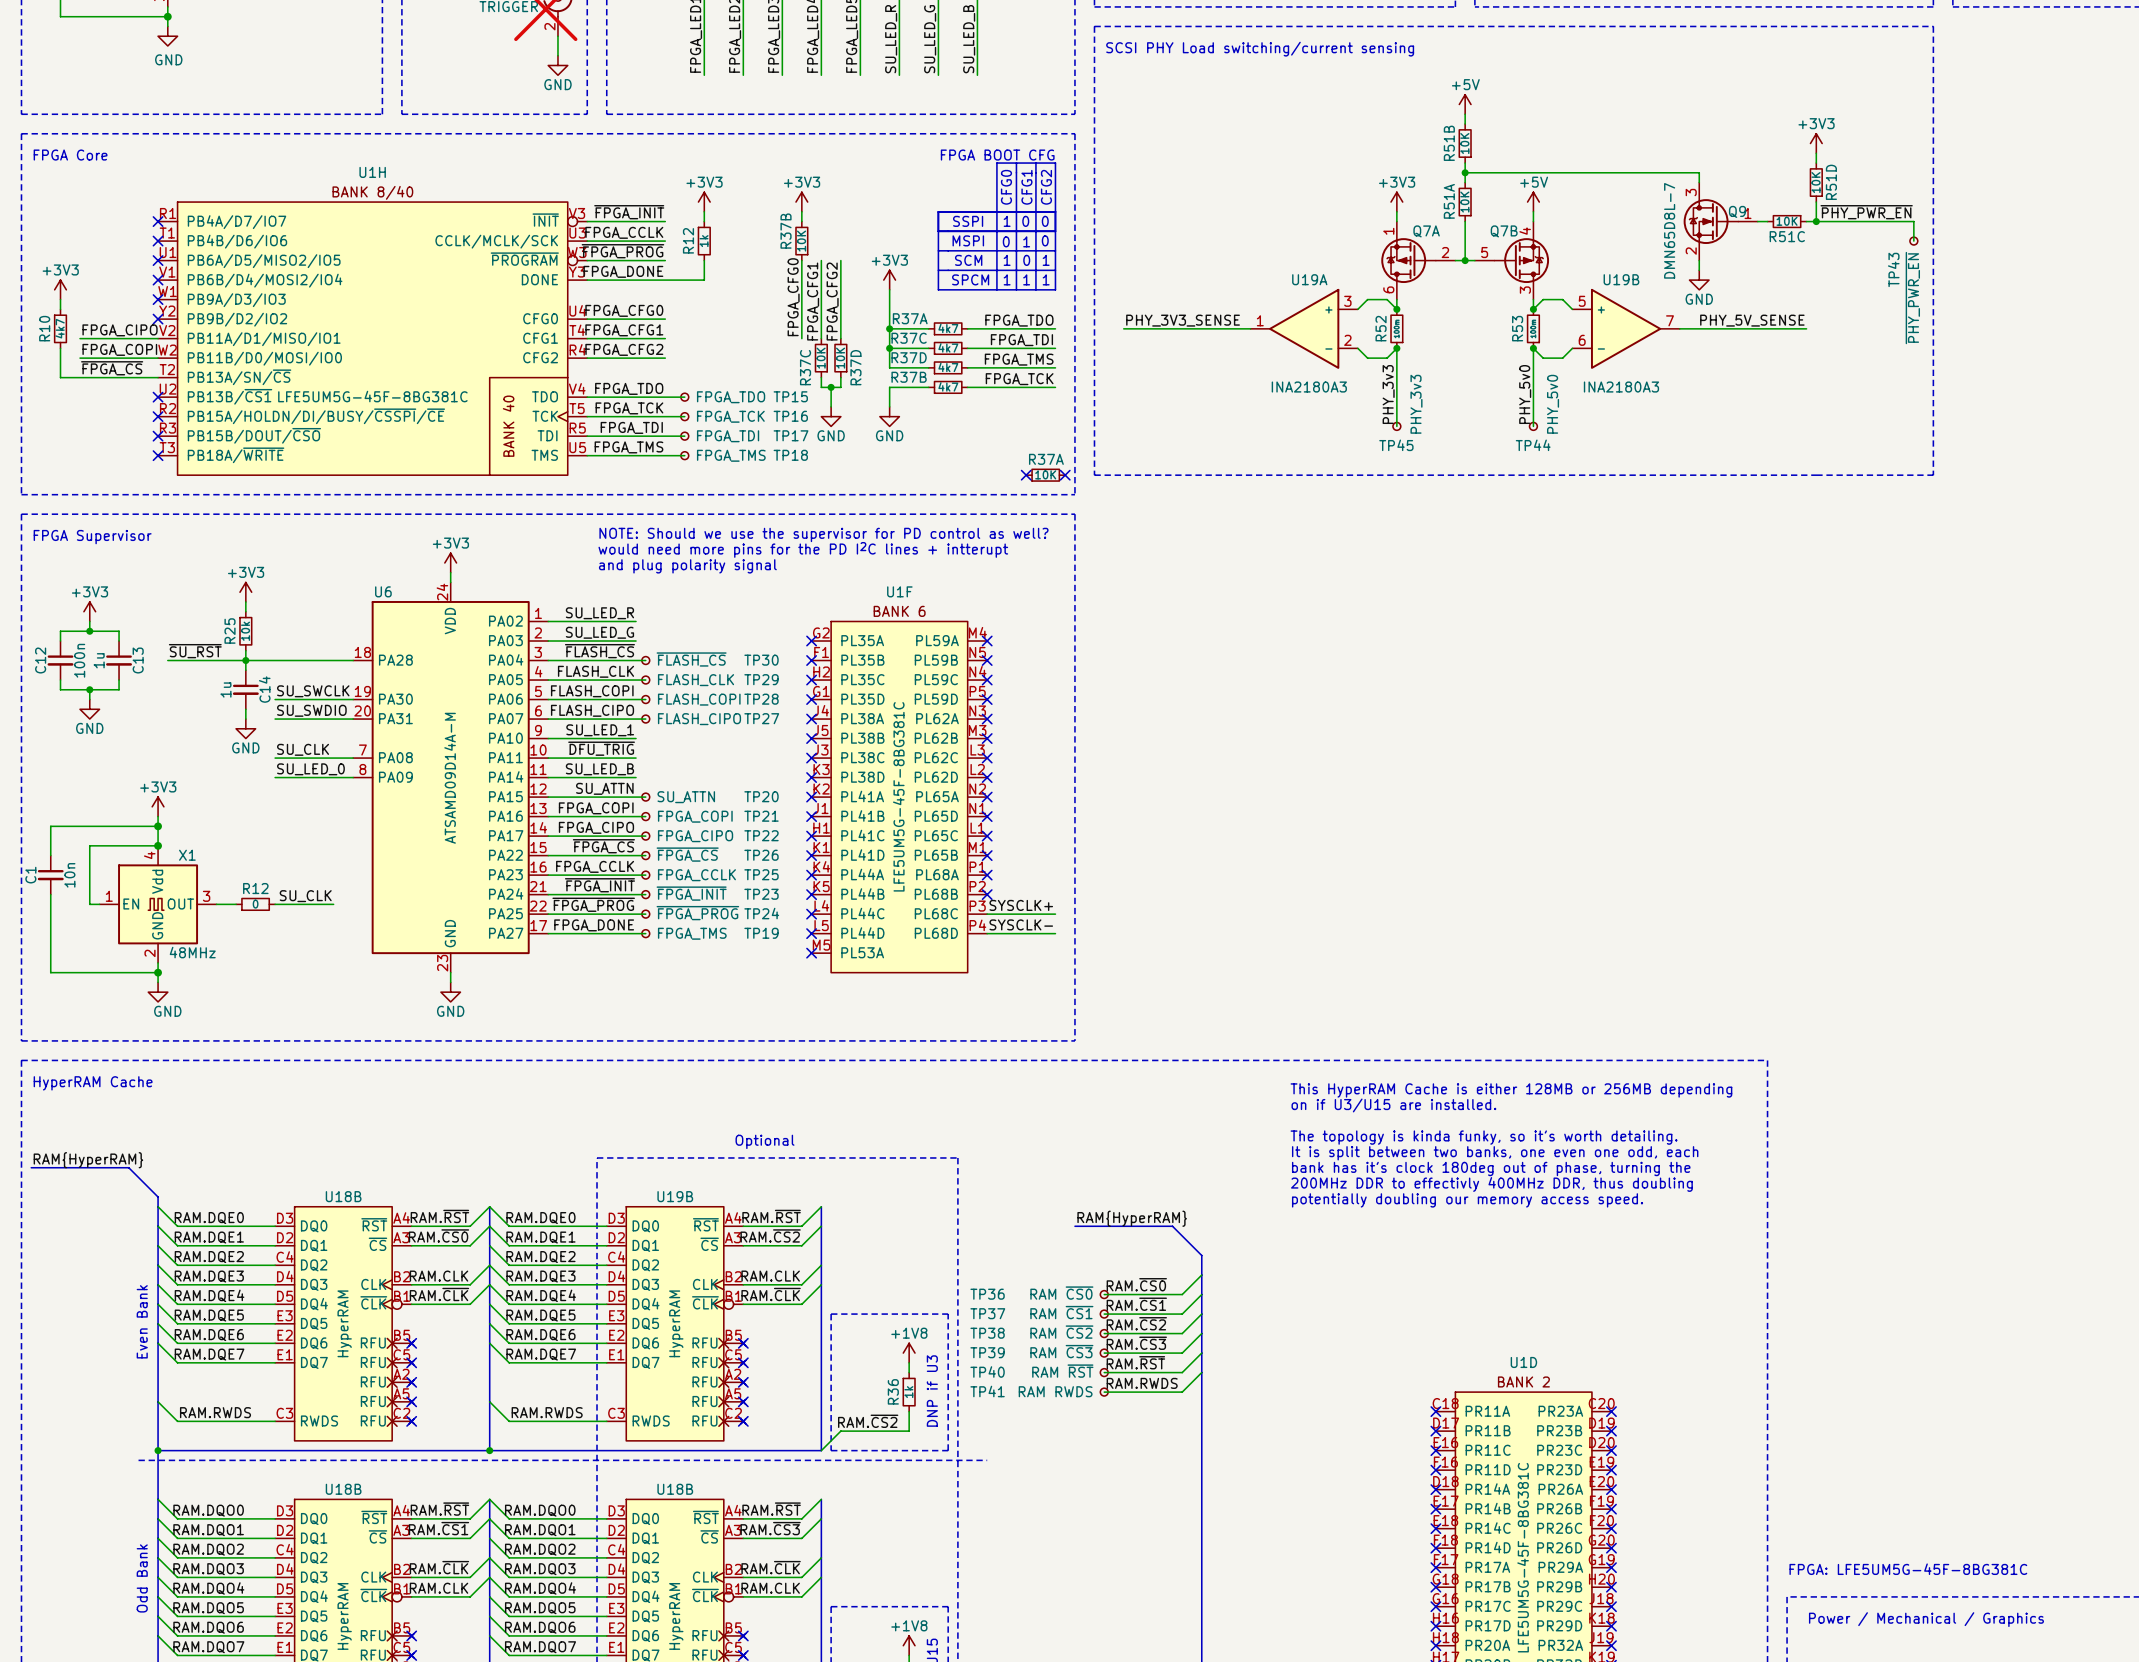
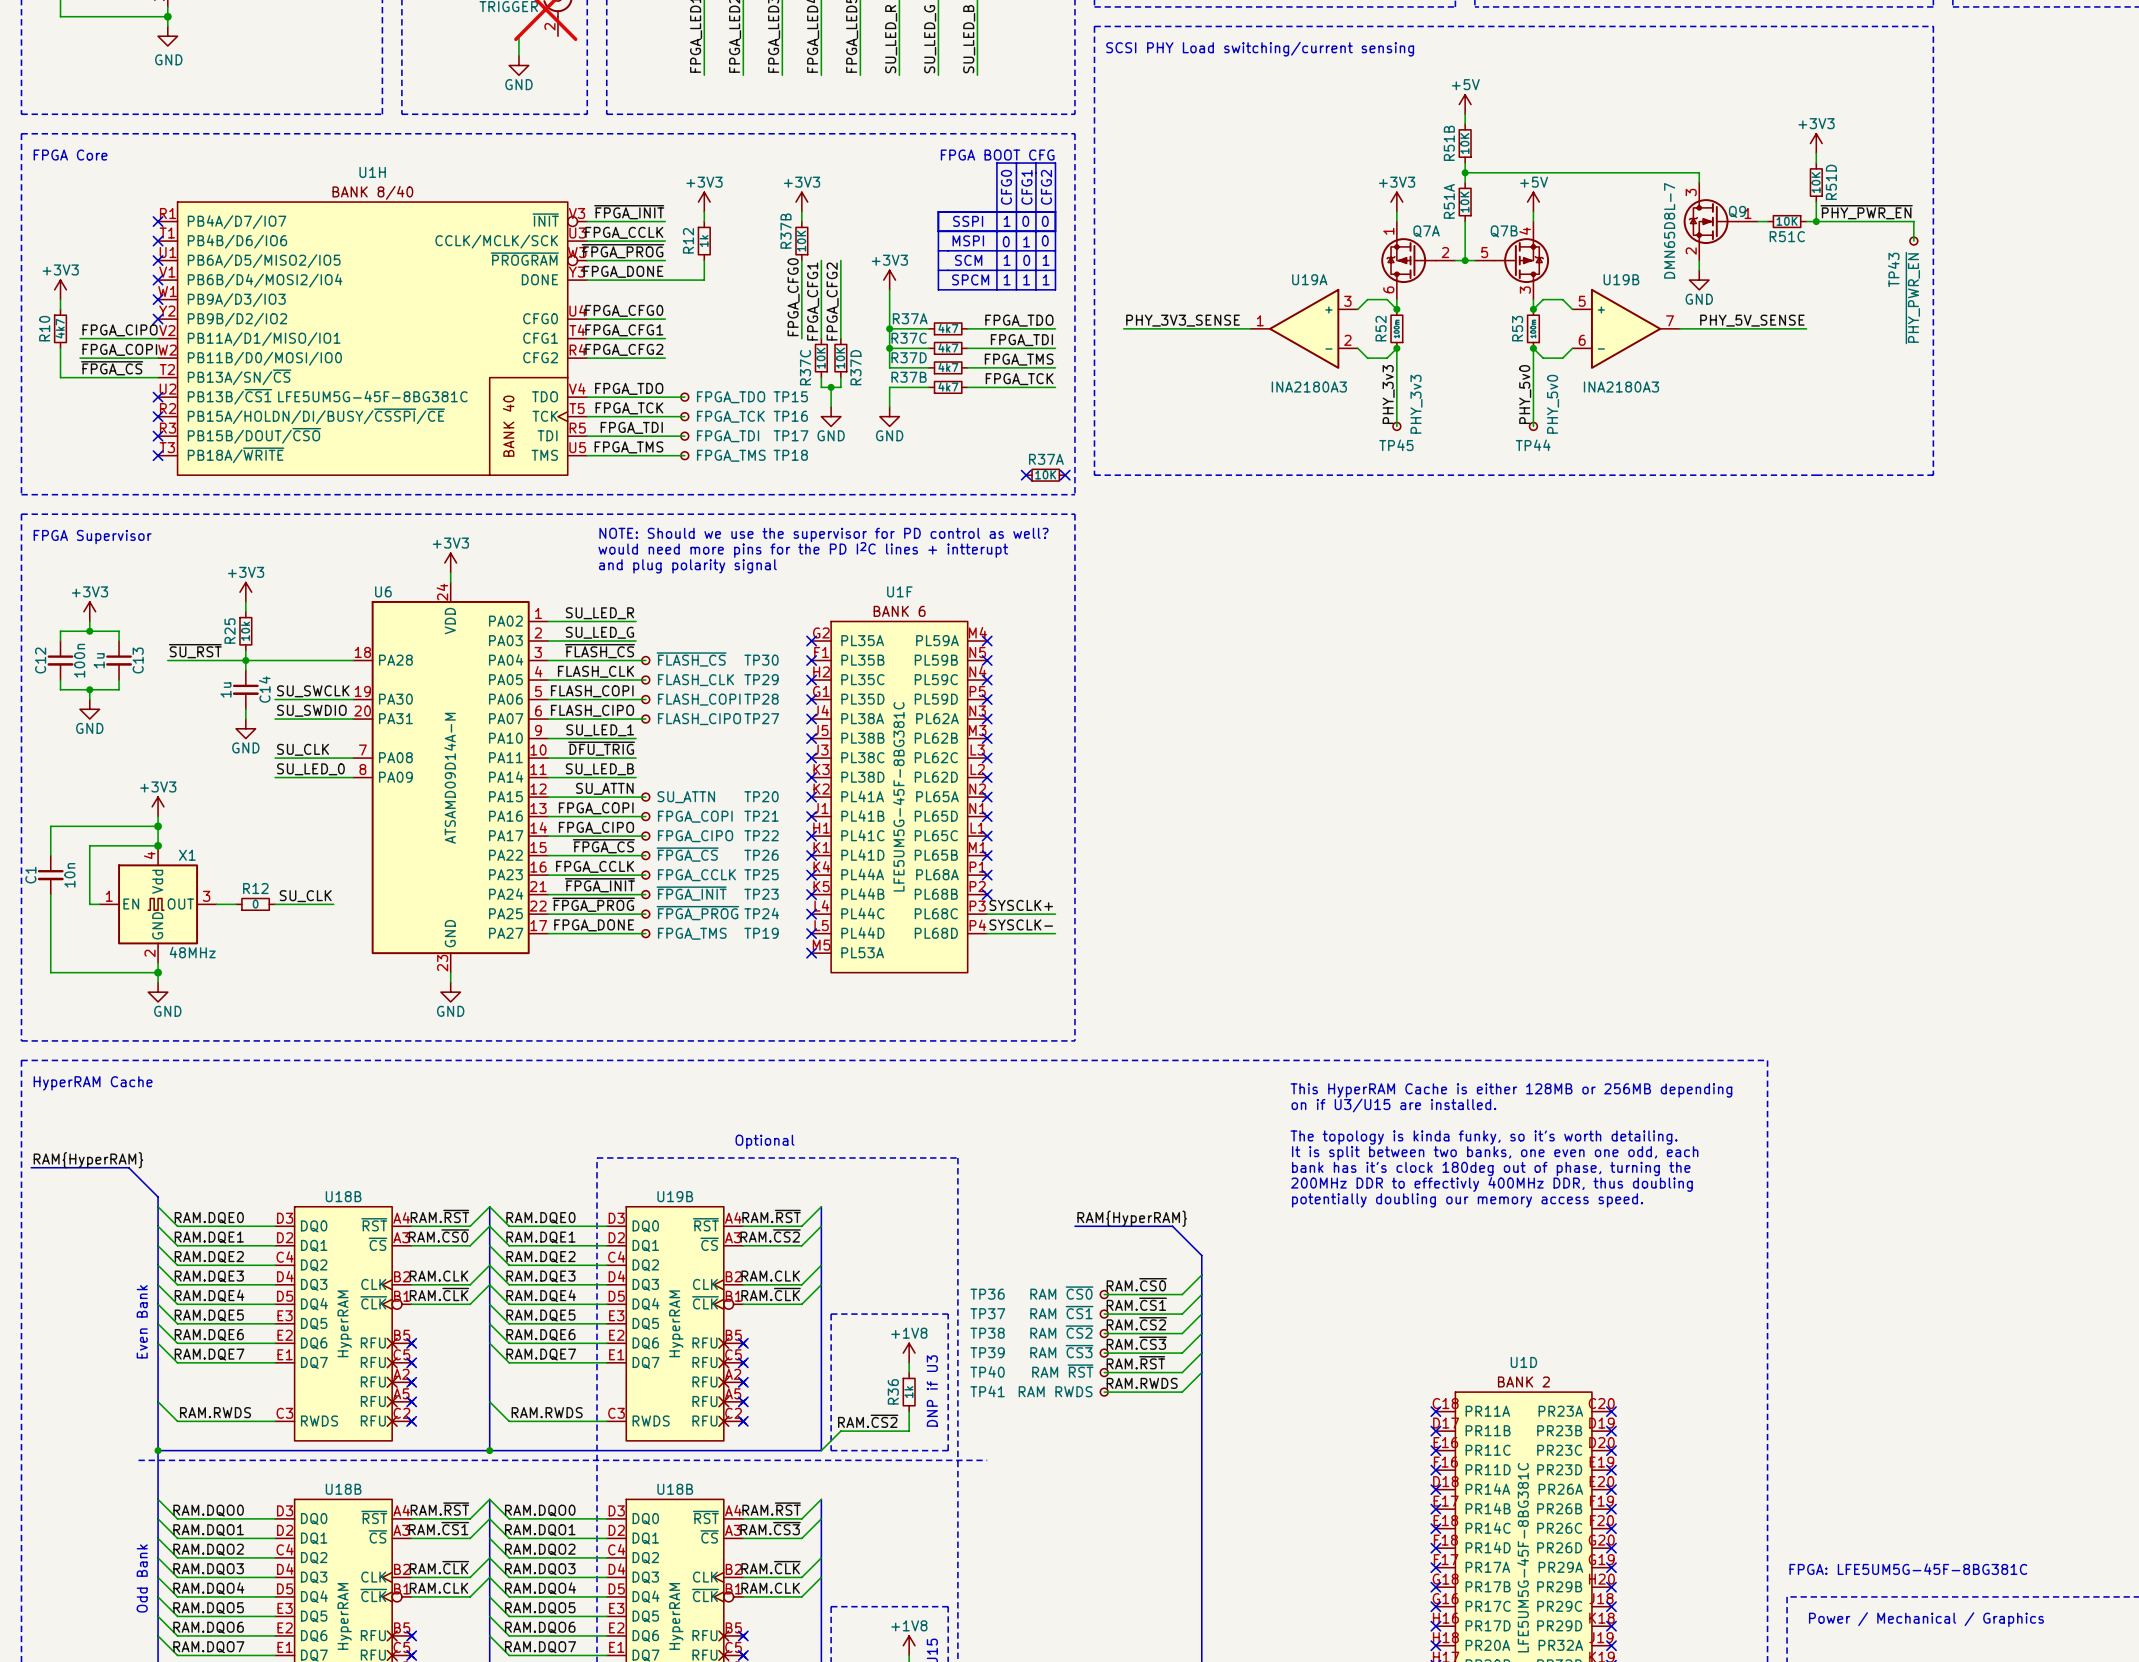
wire: (557, 36) (557, 55) -> (518, 36) (518, 55)
power symbol position: GND (557, 65) -> GND (518, 65)

